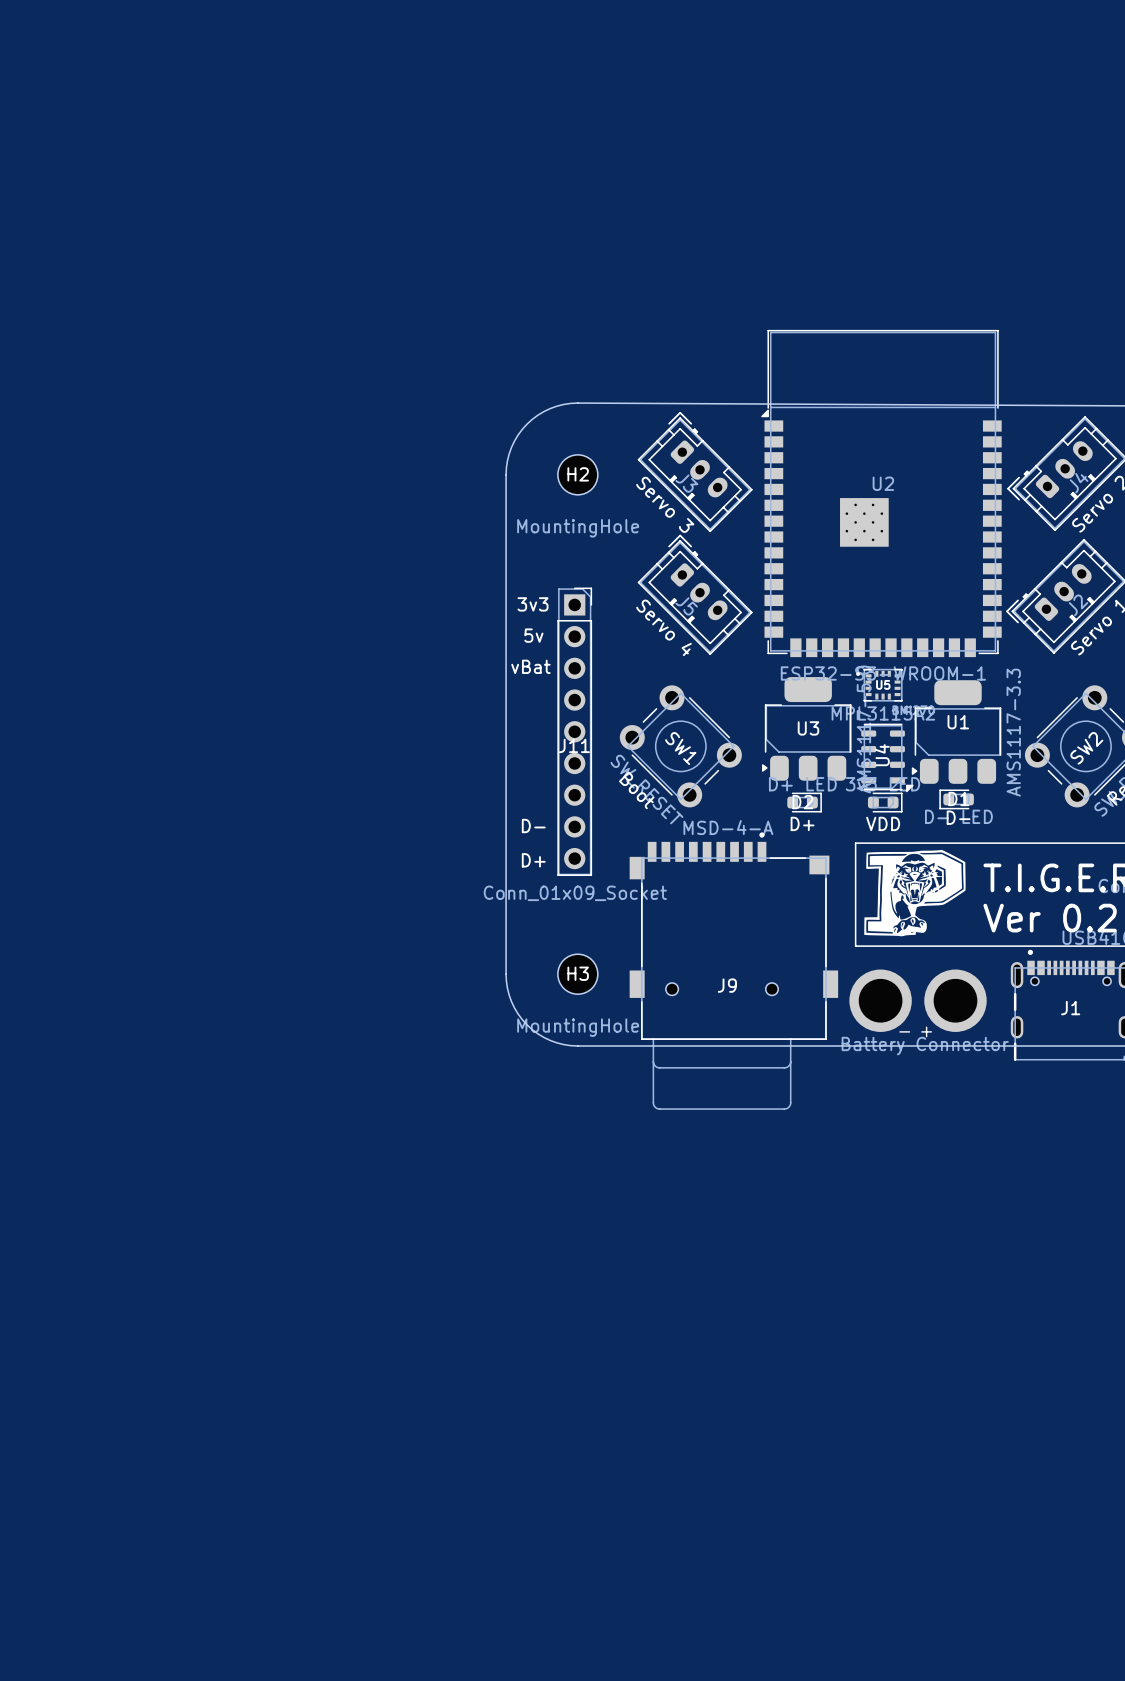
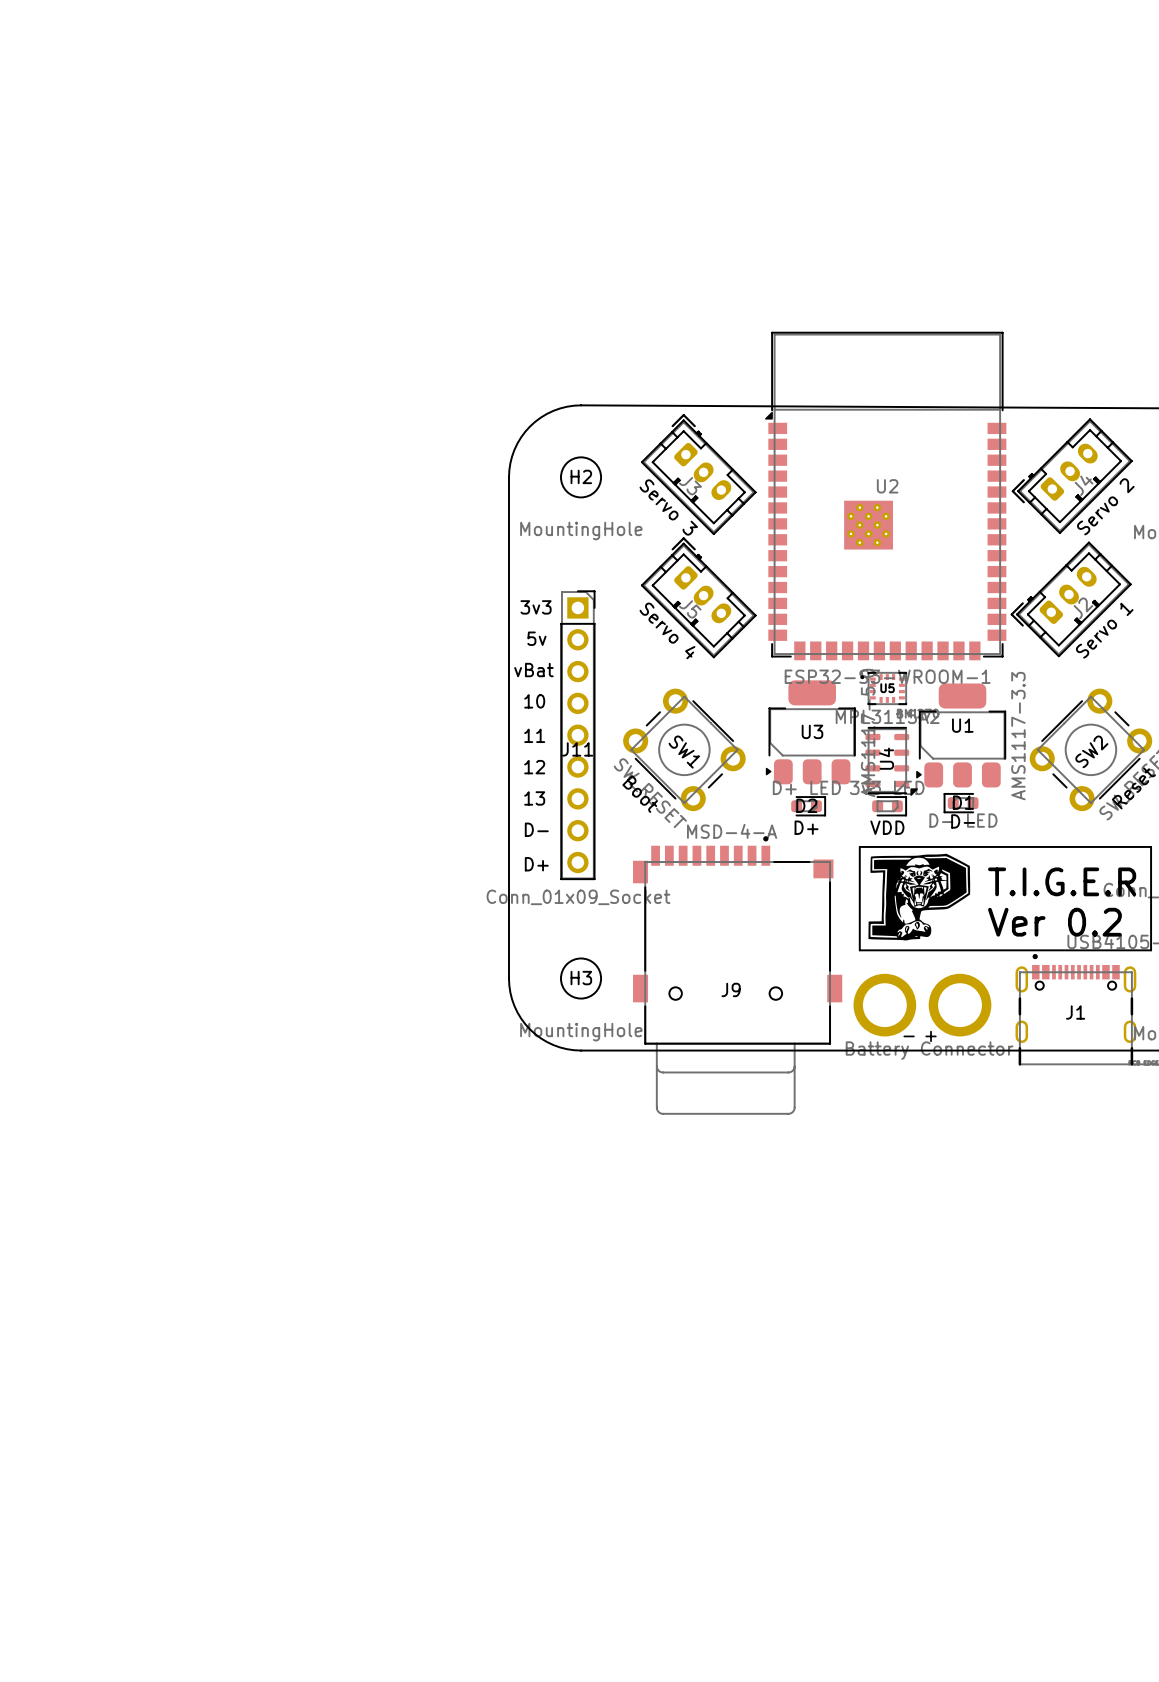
text: none -> 10 (534, 701)
text: none -> 11 (534, 735)
text: none -> 12 (534, 767)
text: none -> 13 (534, 798)

